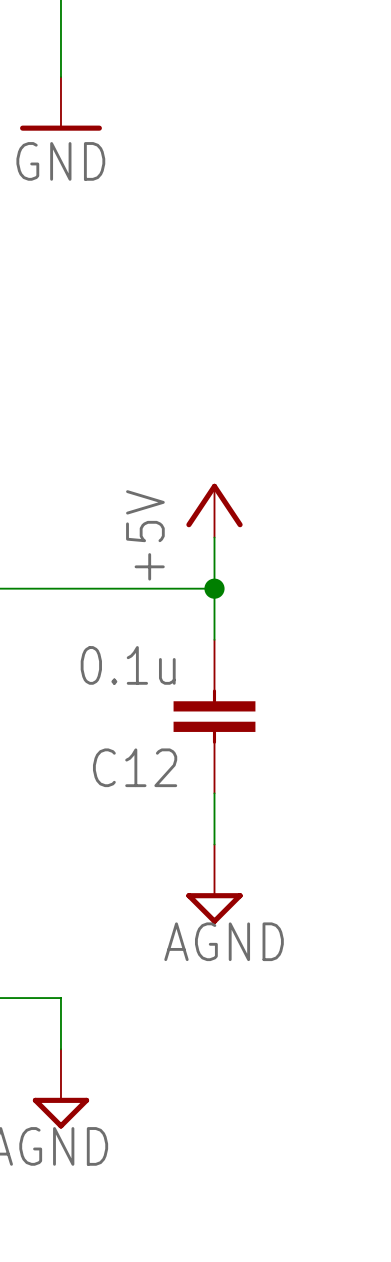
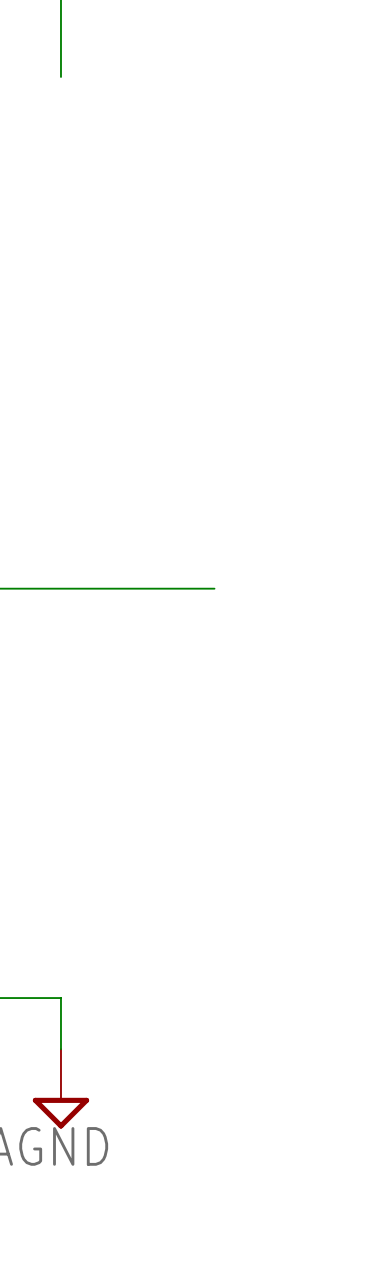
power symbol: GND (60, 103) -> none
power symbol: +5V (214, 510) -> none
wire: (214, 537) (214, 639) -> none
junction: (214, 588) -> none
C12: 0.1u (214, 716) -> none
wire: (214, 793) (214, 844) -> none
power symbol: AGND (214, 884) -> none

